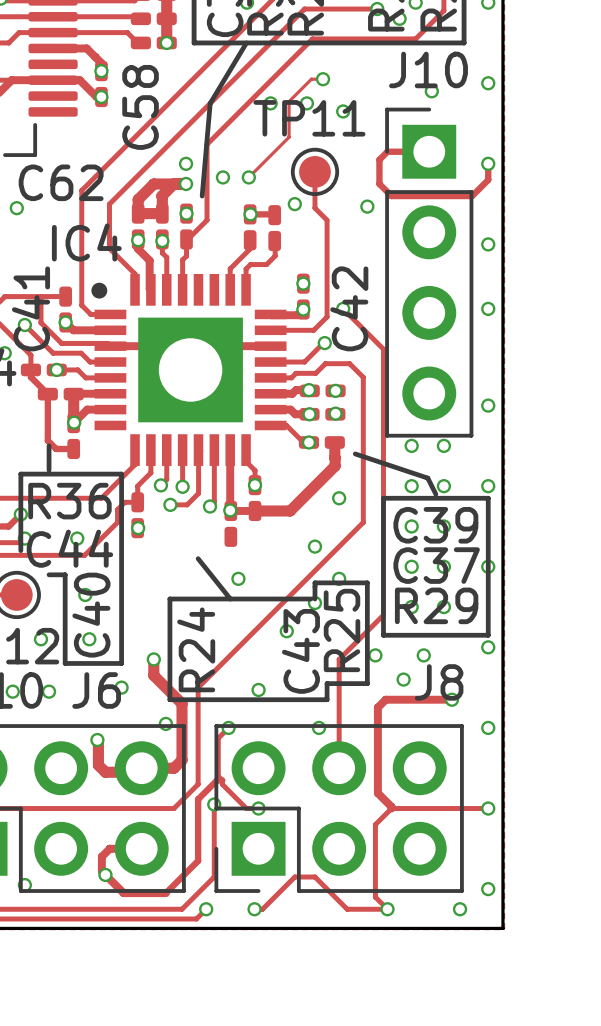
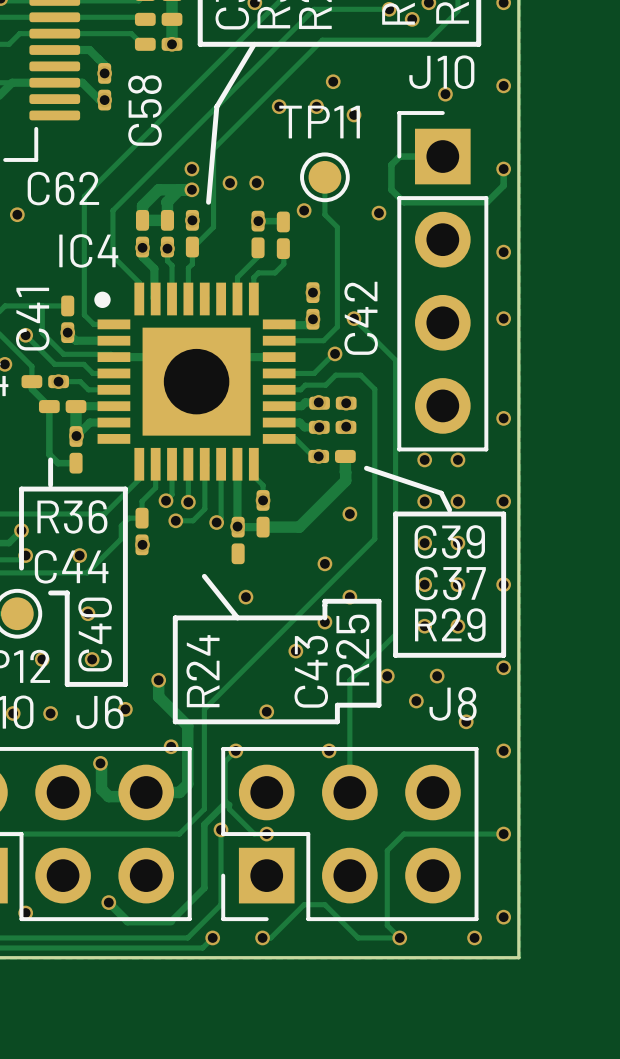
track: (323, 79) (311, 79) (289, 101) (289, 137) (248, 177) -> none
track: (451, 699) (385, 699) (377, 707) (377, 793) (391, 808) -> none
track: (141, 848) (109, 848) (101, 856) (101, 871) (105, 874) -> none

